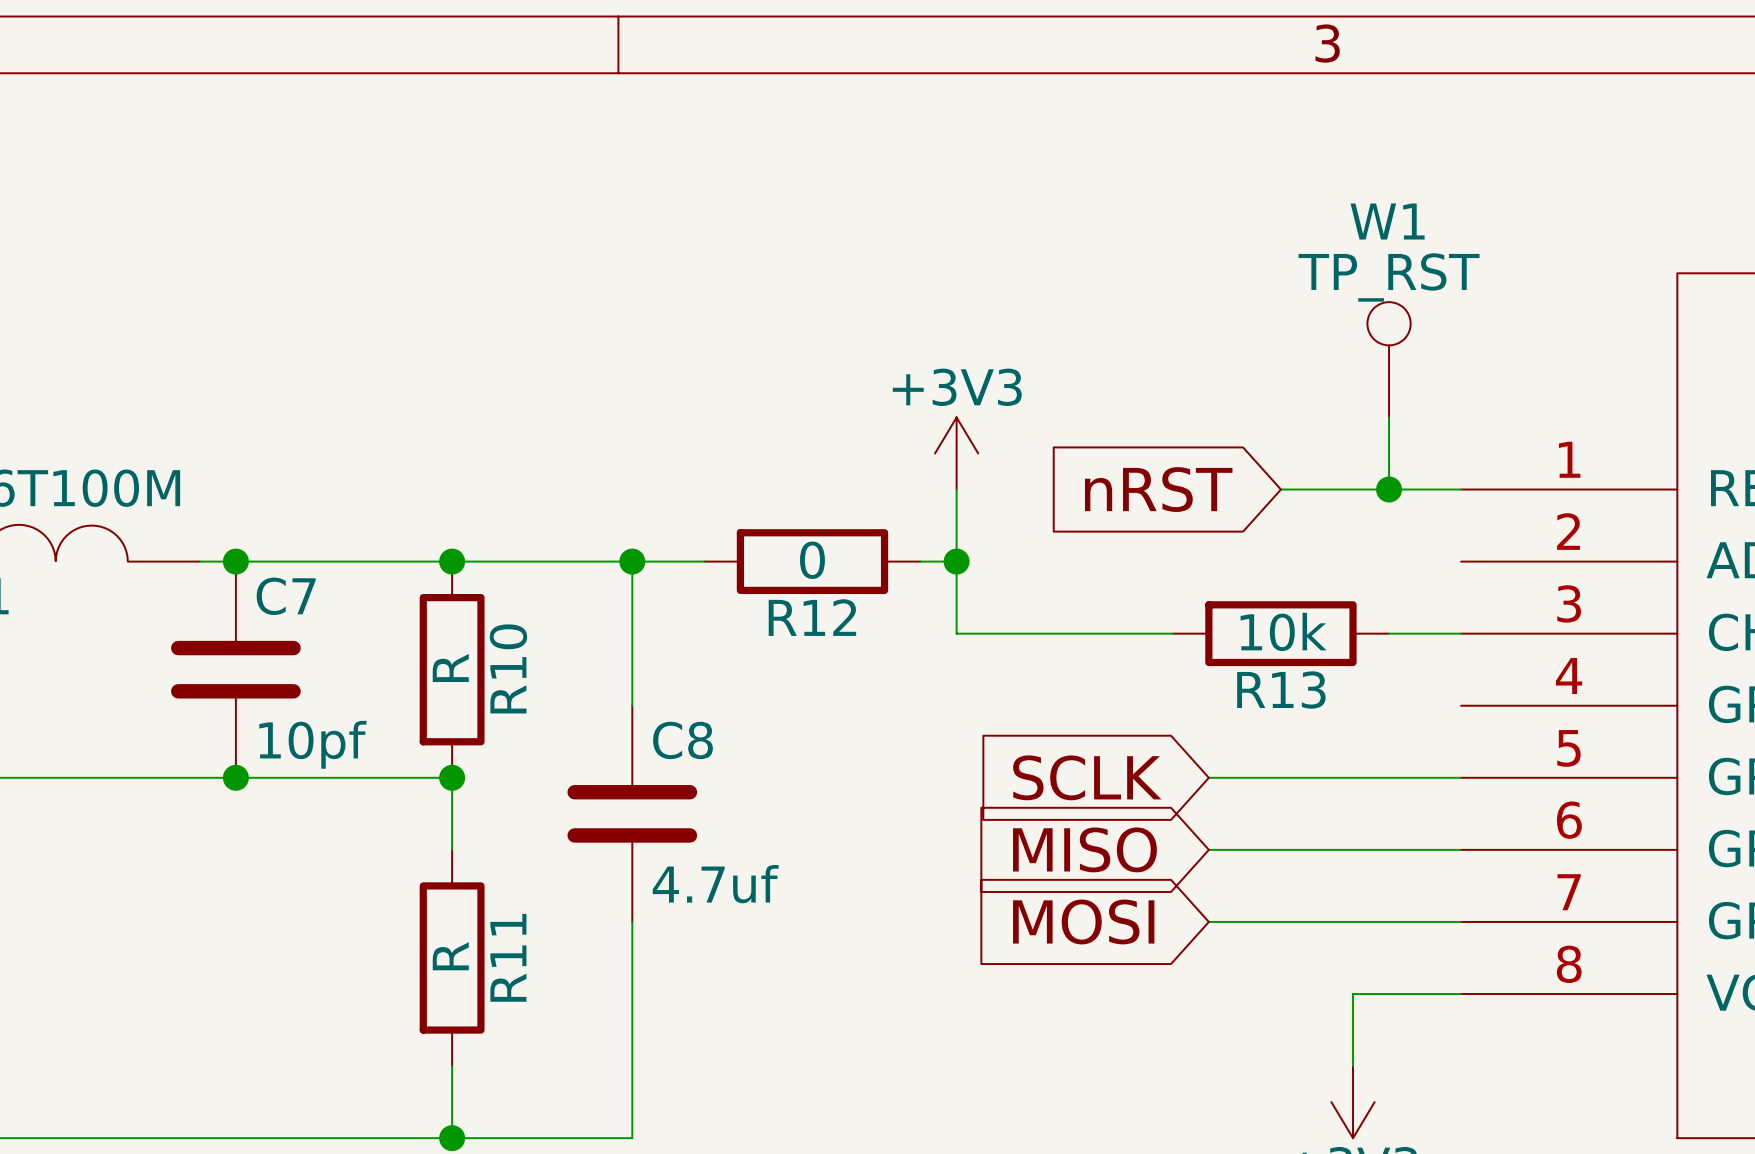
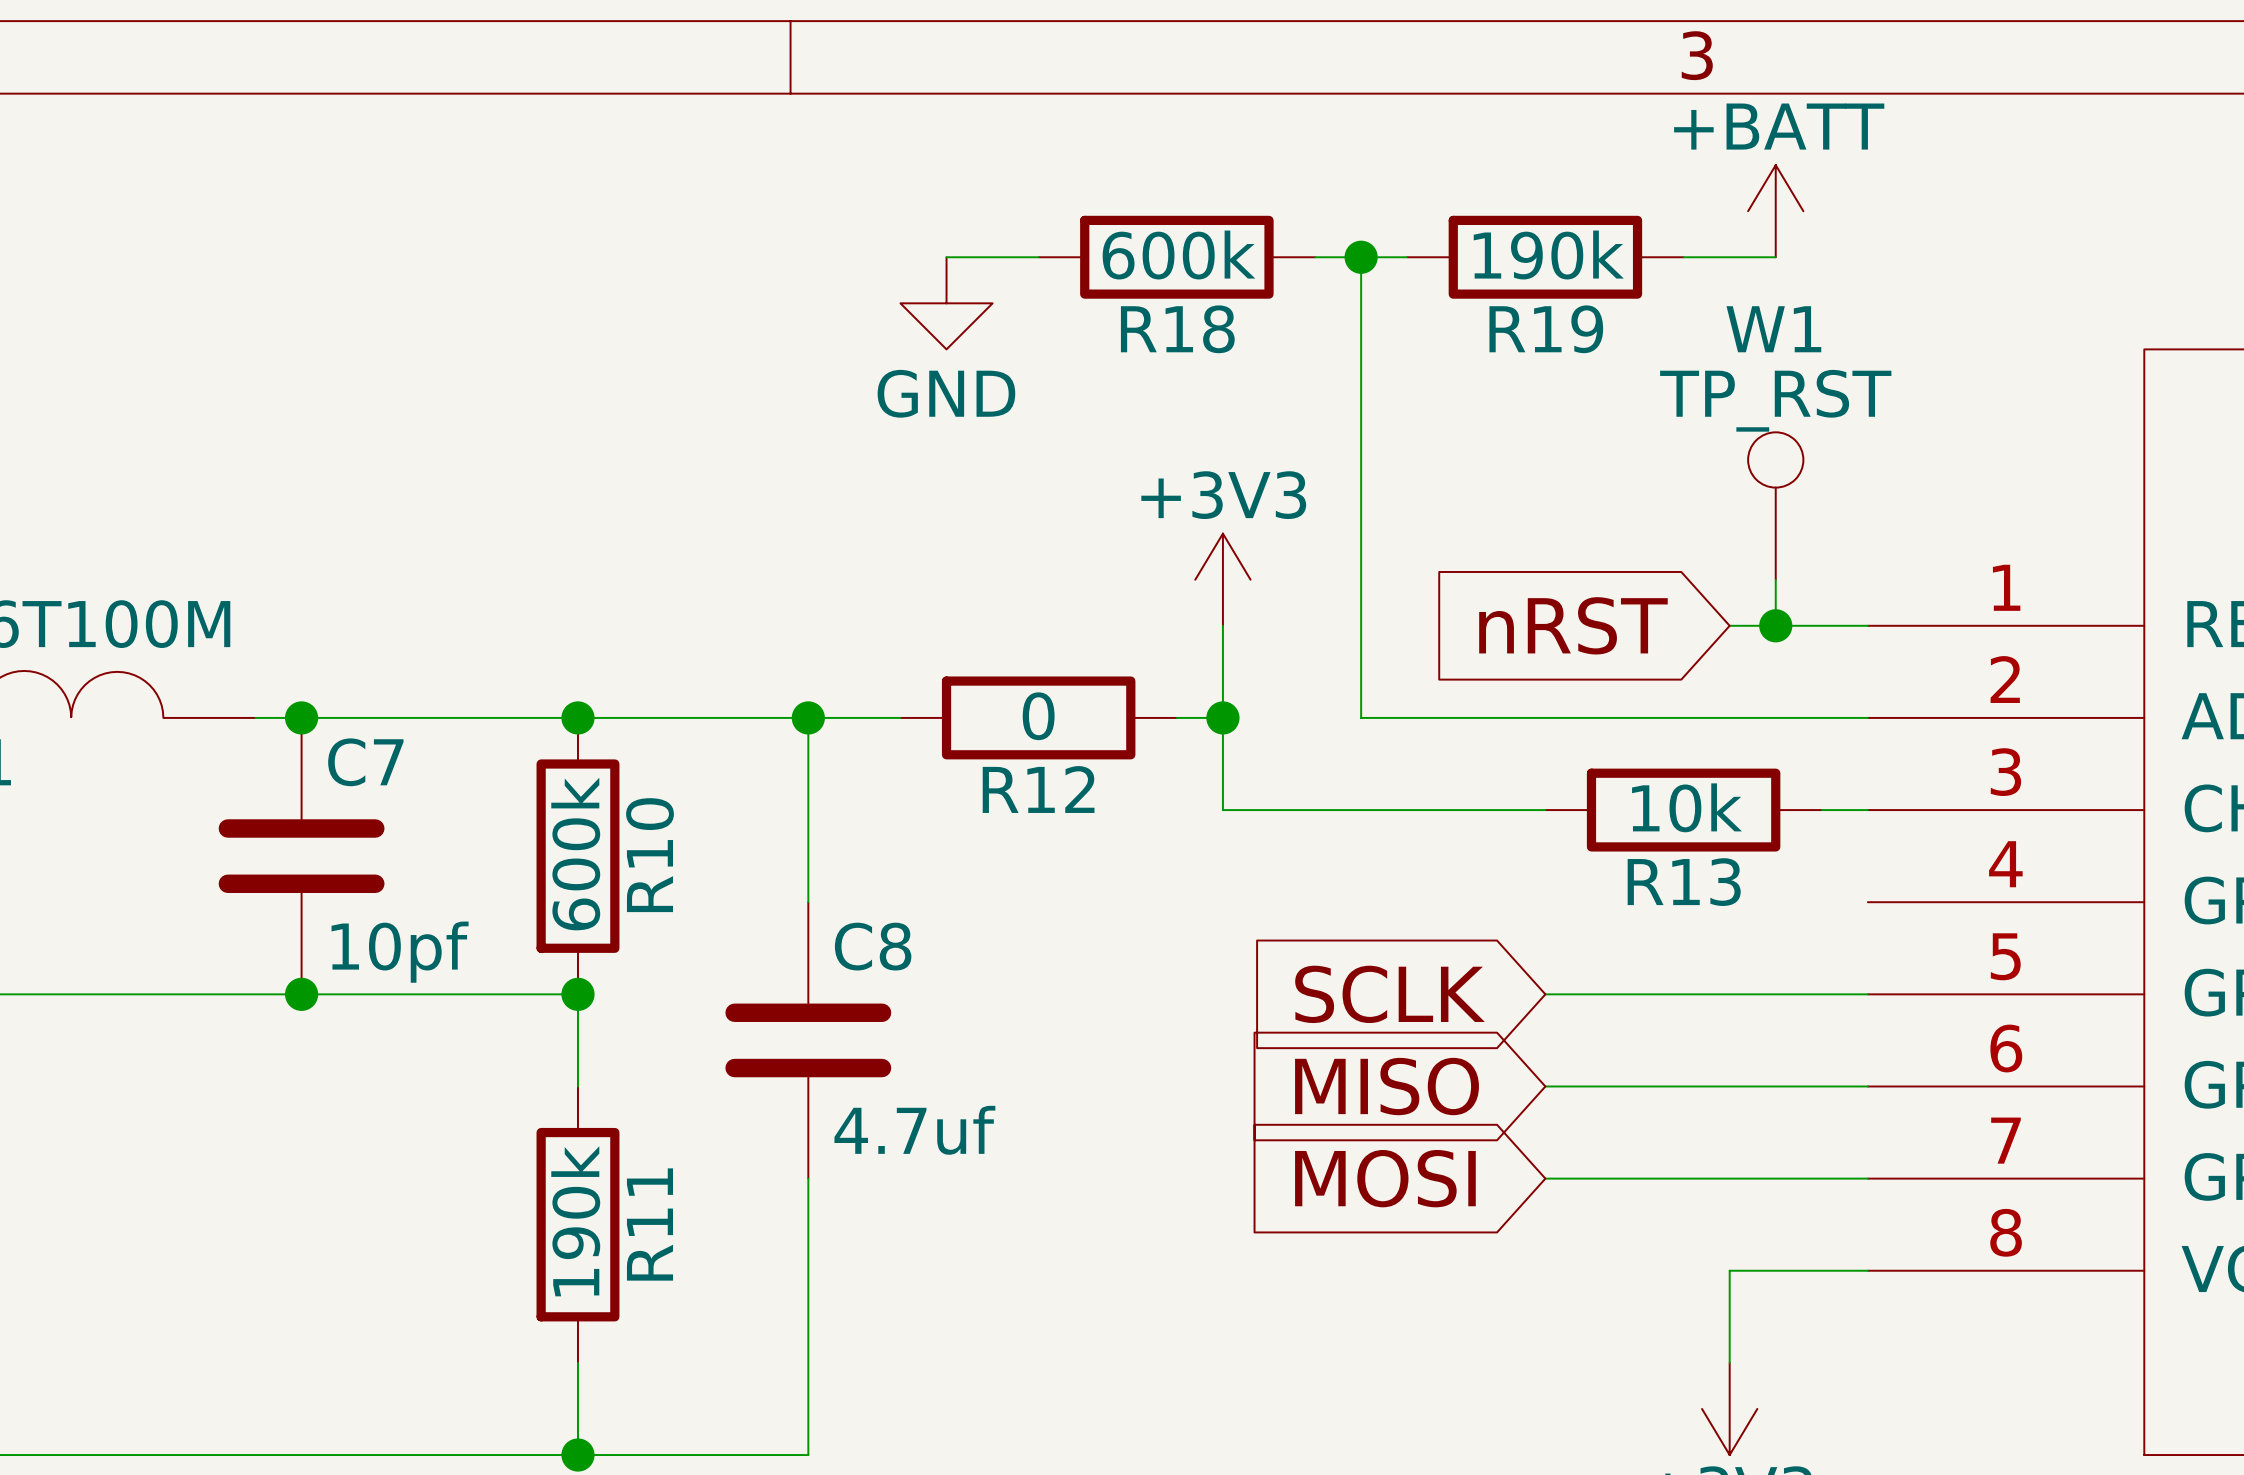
power symbol: none -> +BATT (1775, 211)
wire: none -> (946, 257) (1038, 257)
R18: none -> 600k (1176, 257)
wire: none -> (1315, 257) (1407, 257)
wire: none -> (1361, 257) (1361, 717) (1867, 717)
junction: none -> (1361, 257)
R19: none -> 190k (1545, 257)
power symbol: none -> GND (946, 303)
W1 position: (1389, 359) -> (1775, 506)
global label position: nRST (1158, 489) -> nRST (1573, 625)
wire: (1280, 489) (1353, 489) -> (1683, 257) (1775, 257)
R13 position: (1280, 633) -> (1683, 810)
R10 value: R (450, 667) -> 600k (575, 854)
R11 value: R (450, 956) -> 190k (575, 1221)

